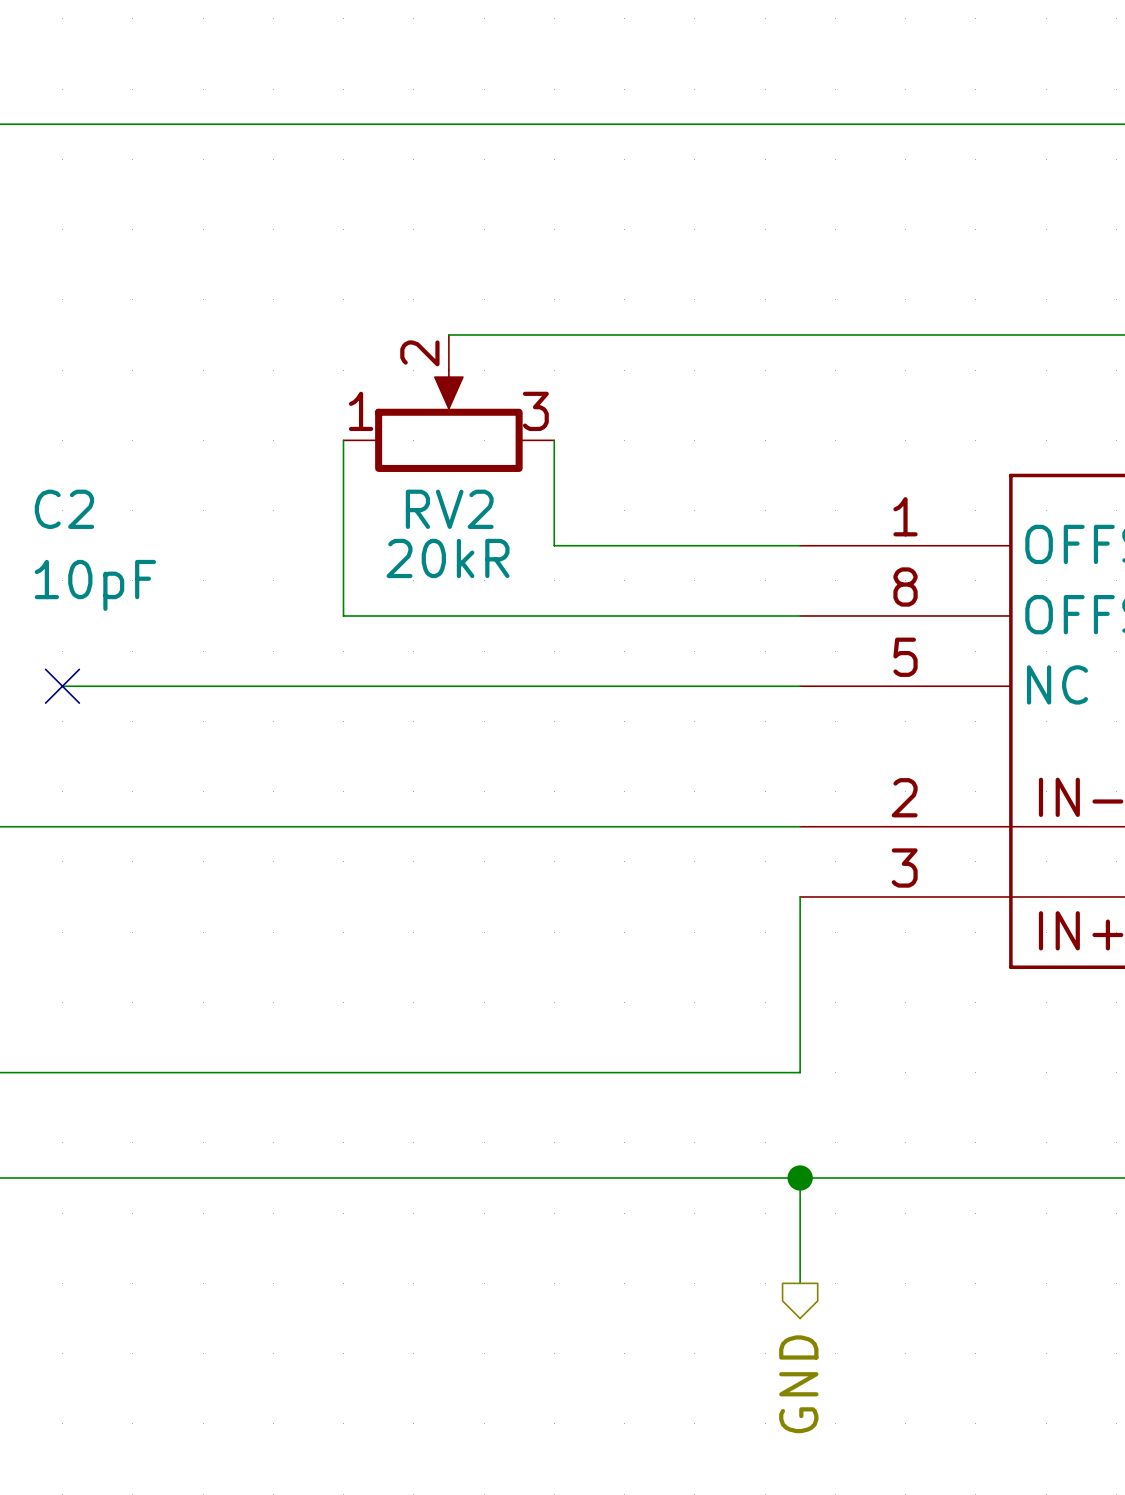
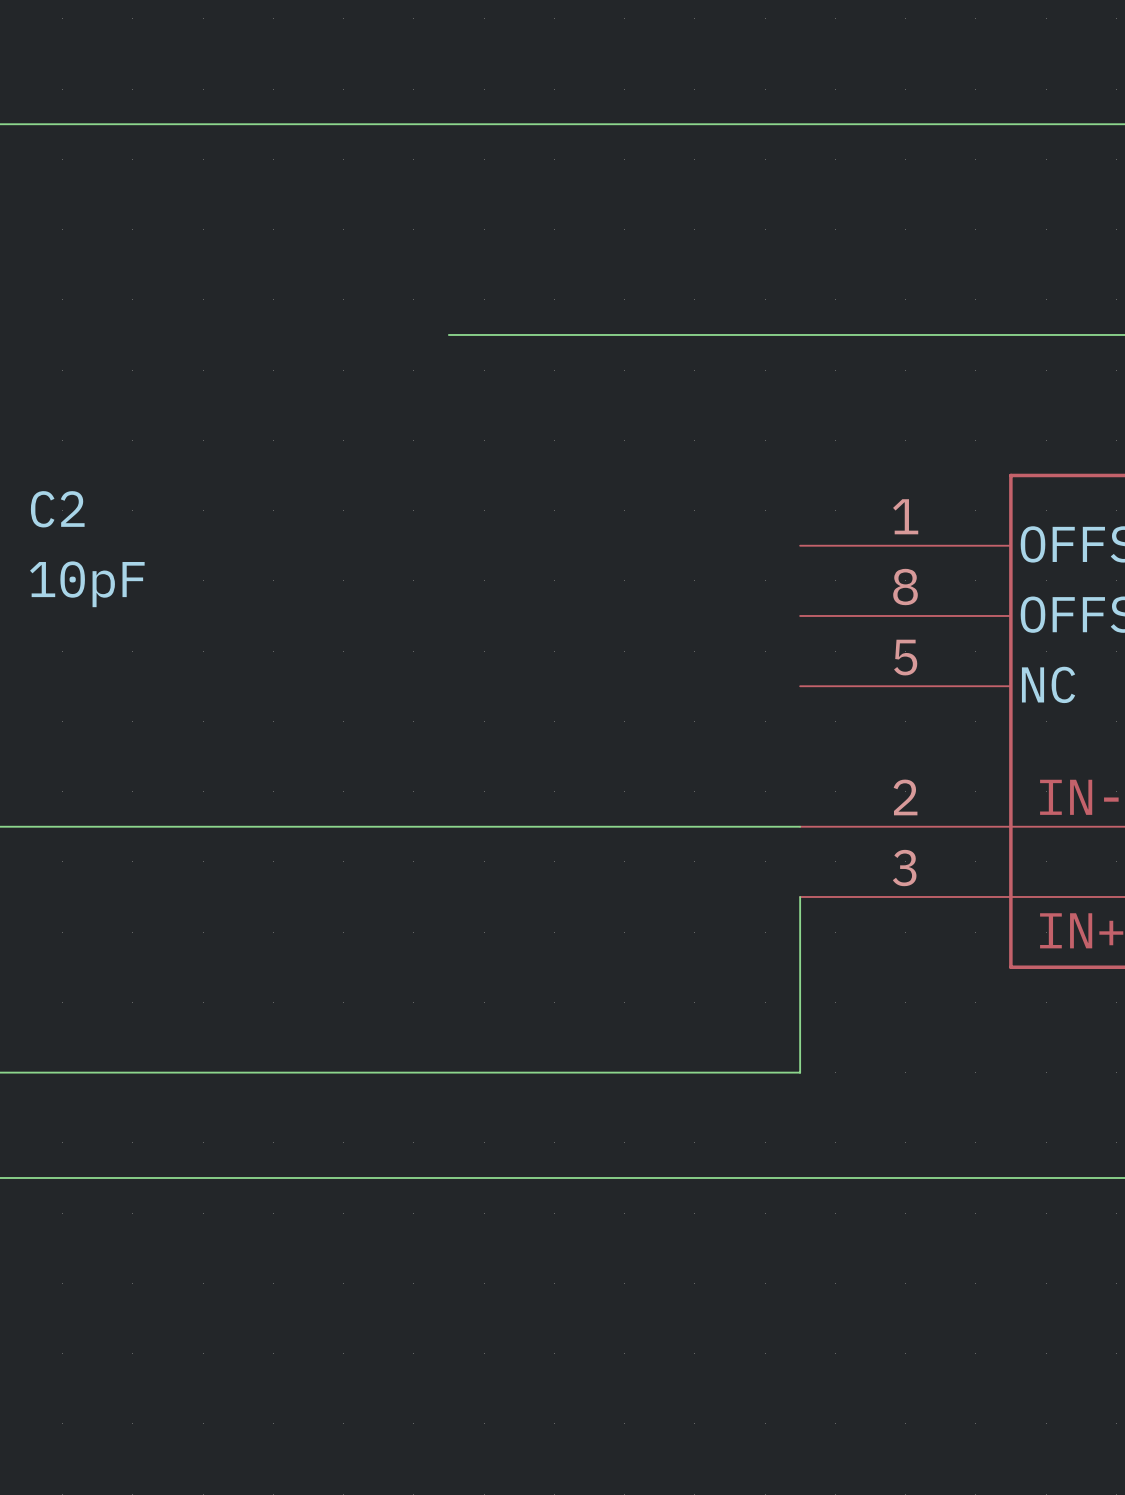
RV2: 20kR (448, 403) -> none
wire: (343, 440) (343, 615) (800, 615) -> none
wire: (554, 440) (554, 545) (800, 545) -> none
wire: (62, 686) (800, 686) -> none
no-connect mark: (62, 686) -> none
wire: (800, 1177) (800, 1283) -> none
junction: (800, 1177) -> none
hierarchical label: GND (798, 1384) -> none

